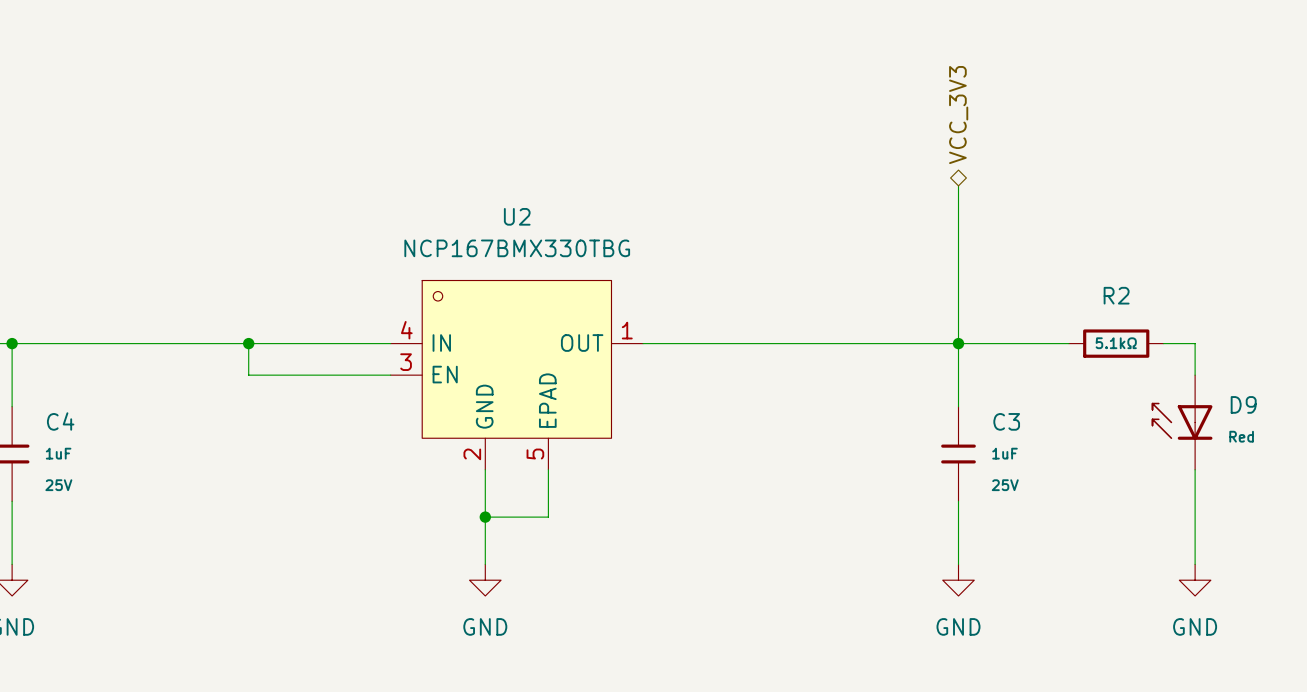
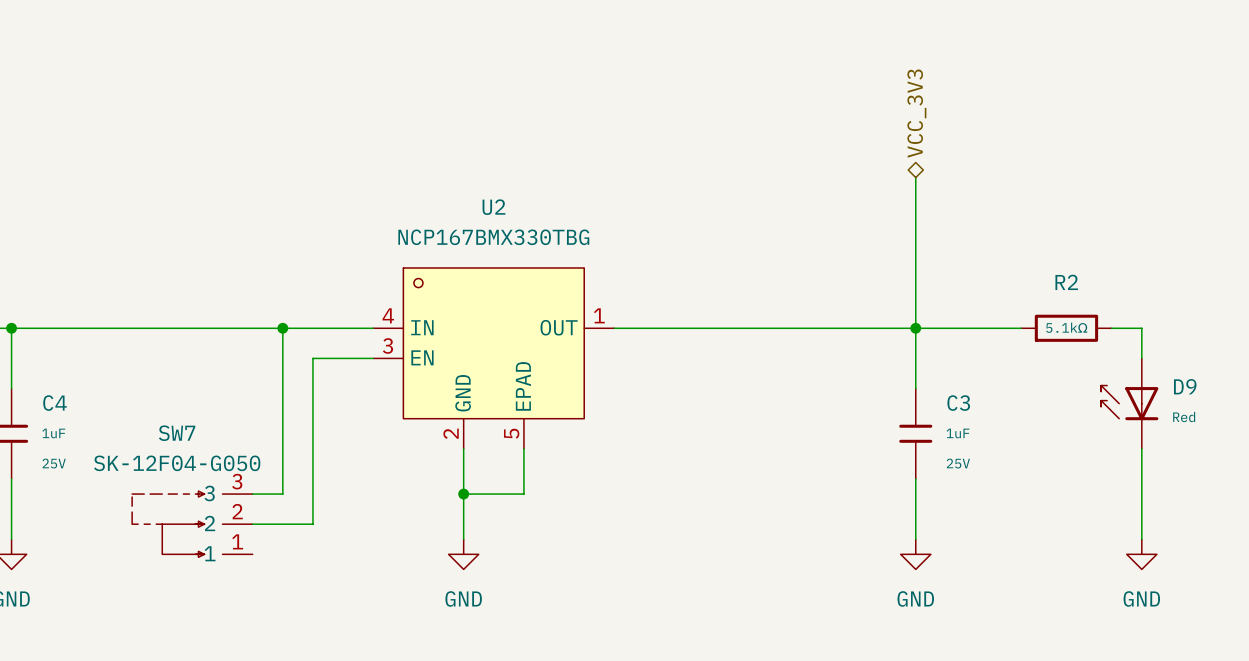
wire: (248, 343) (248, 375) (327, 375) -> (252, 524) (312, 524) (312, 358)
junction position: (248, 343) -> (282, 328)
wire: none -> (282, 328) (282, 494) (252, 494)
SW7: none -> SK-12F04-G050 (192, 524)

